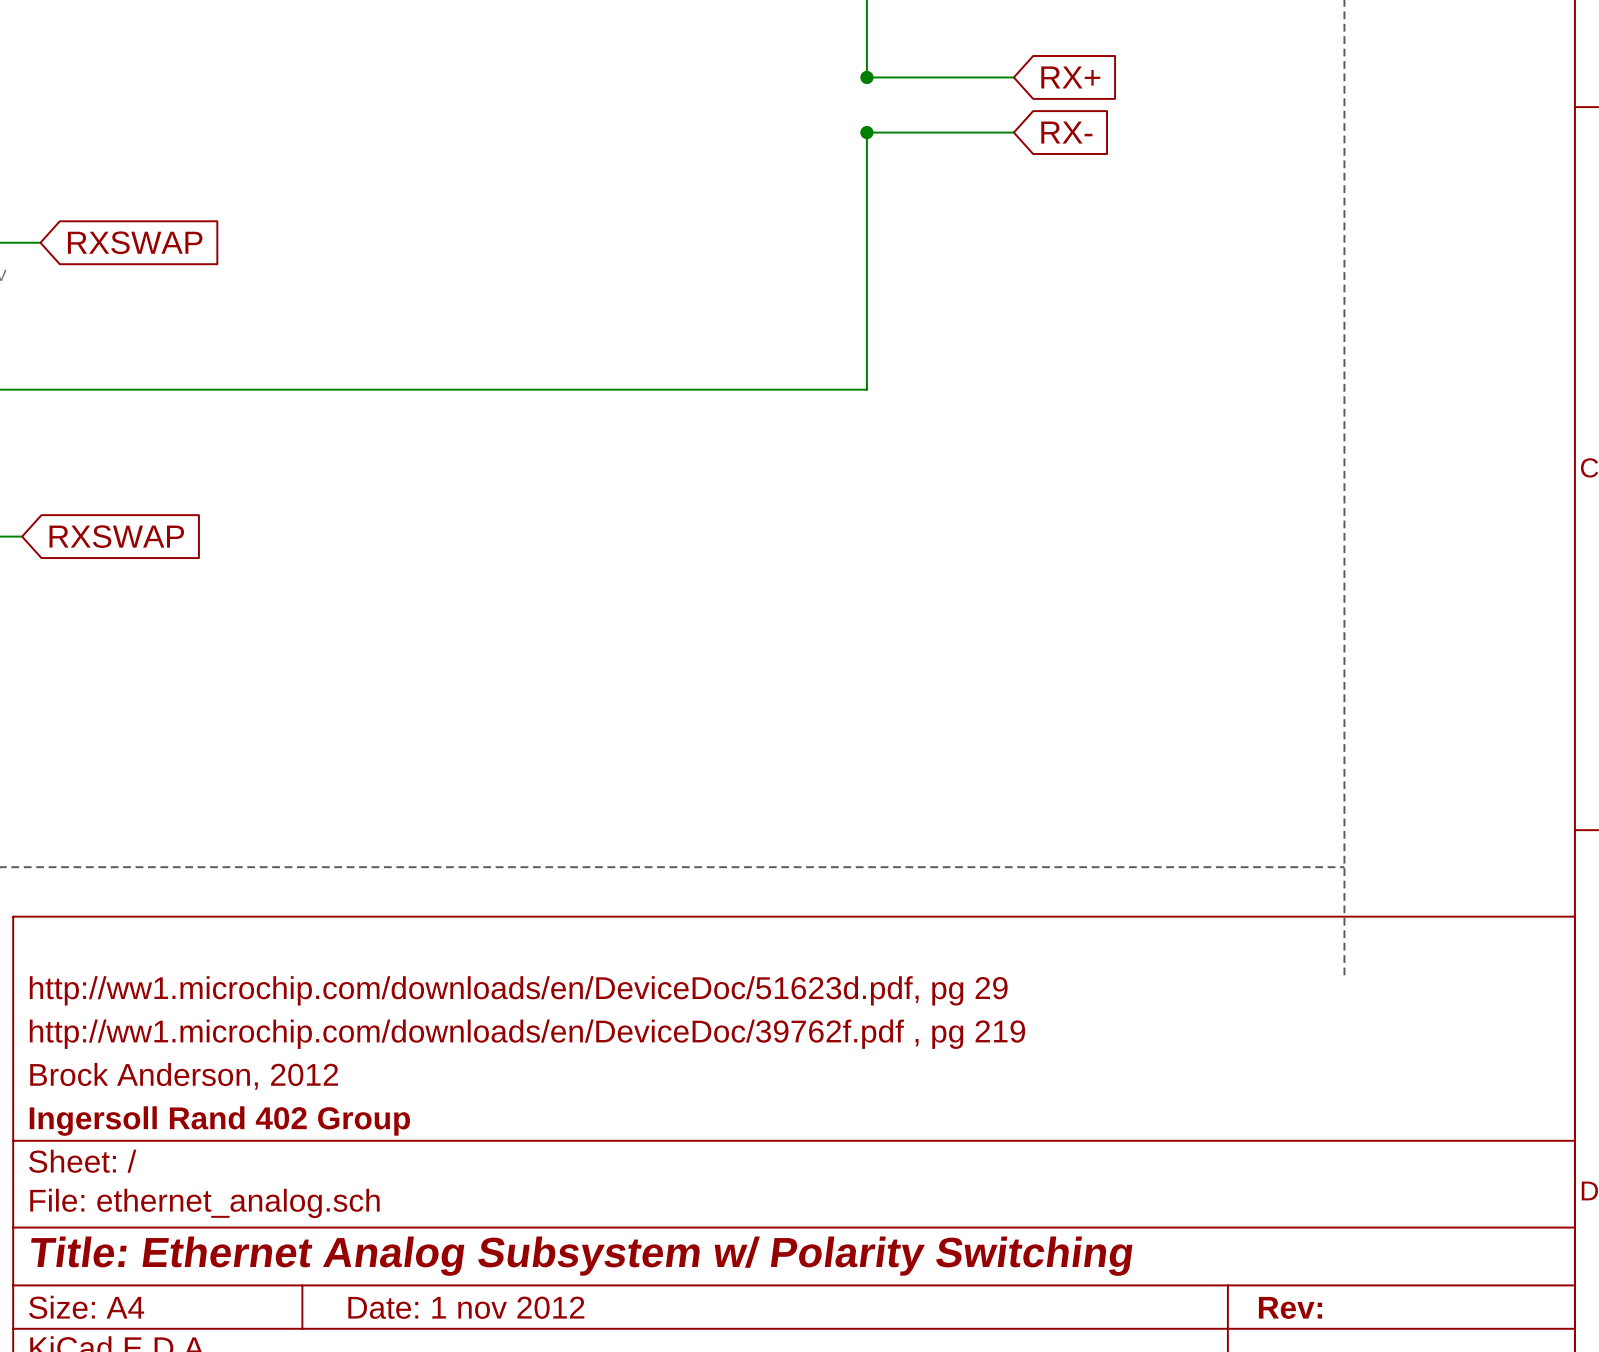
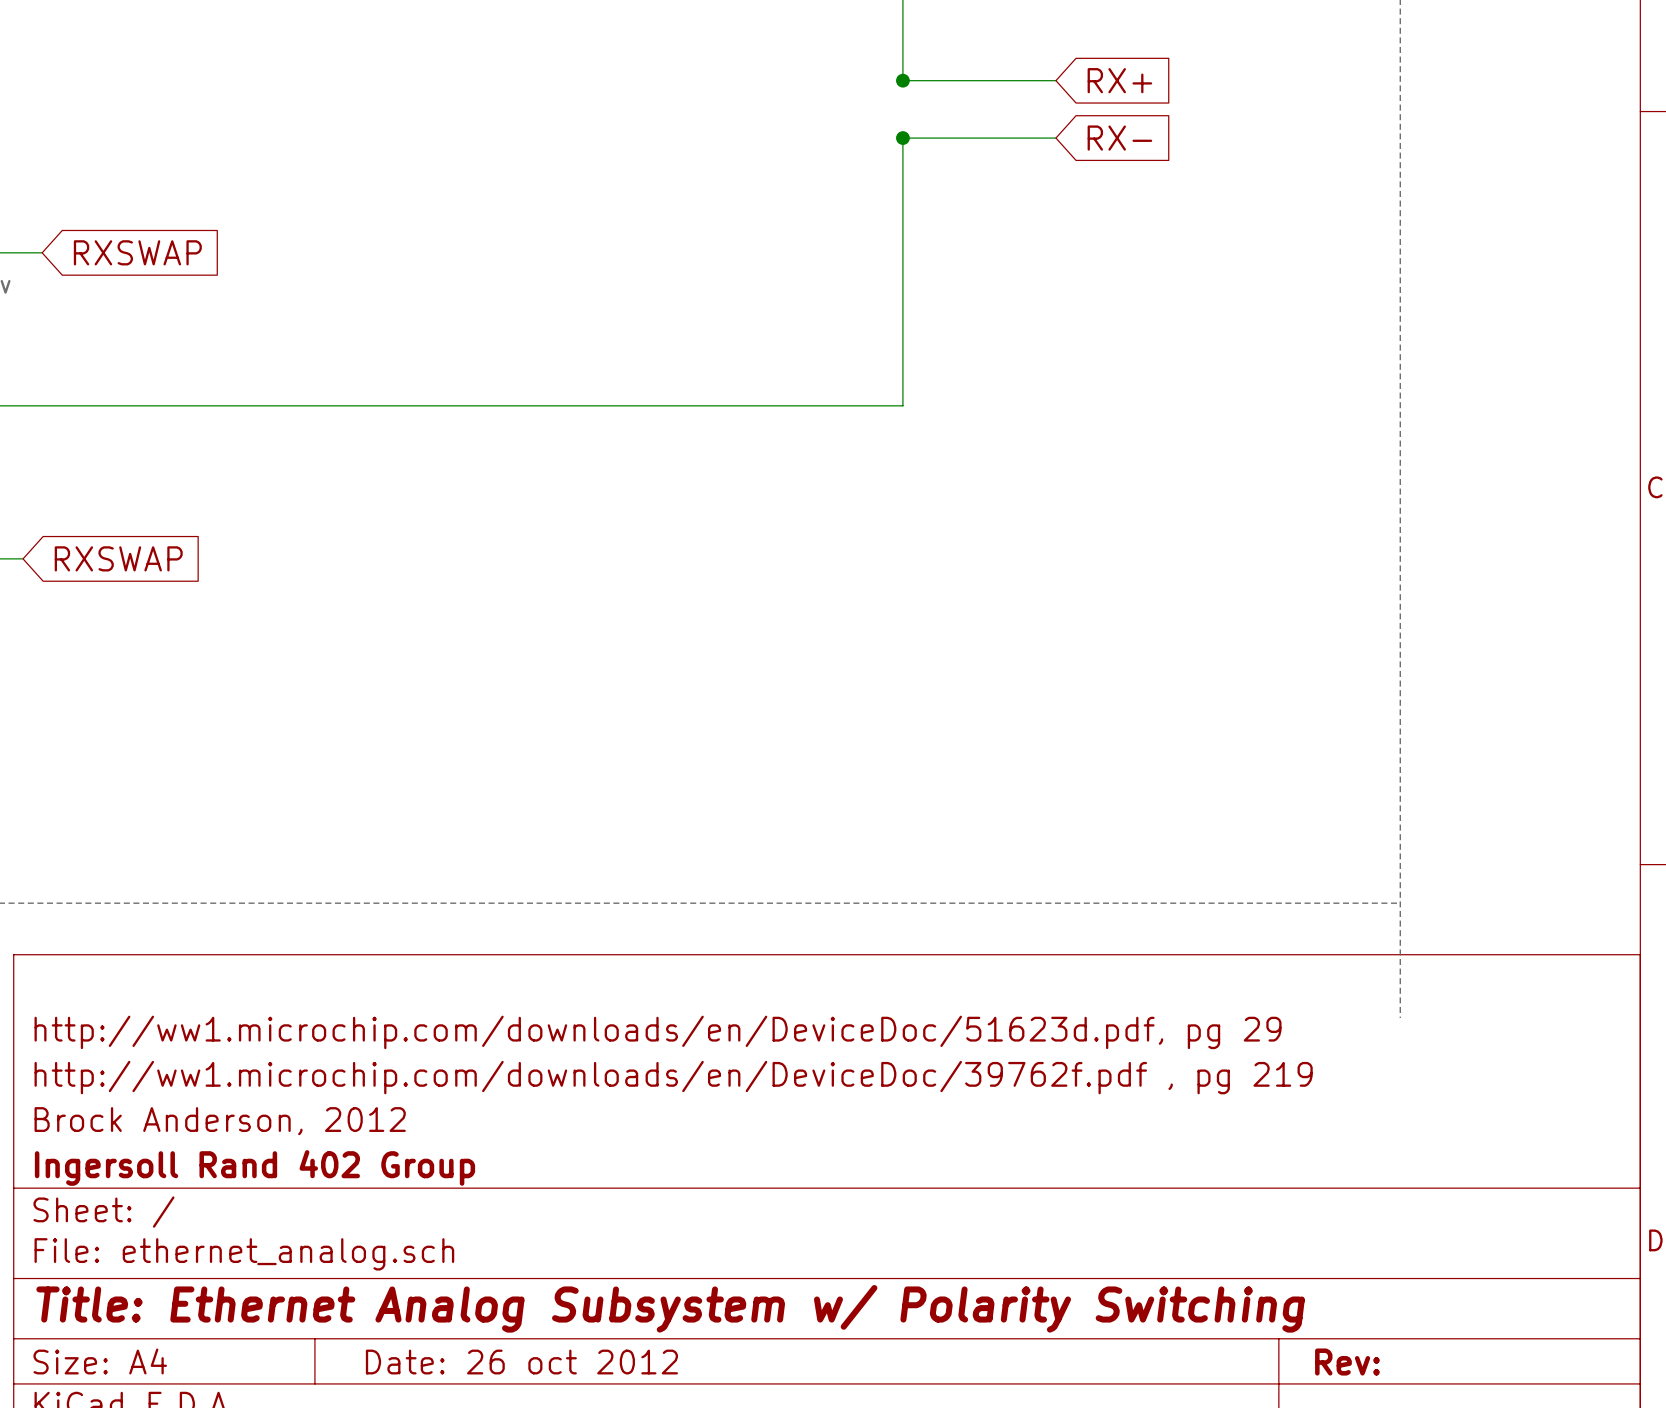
title block: Date: 1 nov 2012 (466, 1307) -> Date: 26 oct 2012 (521, 1362)

